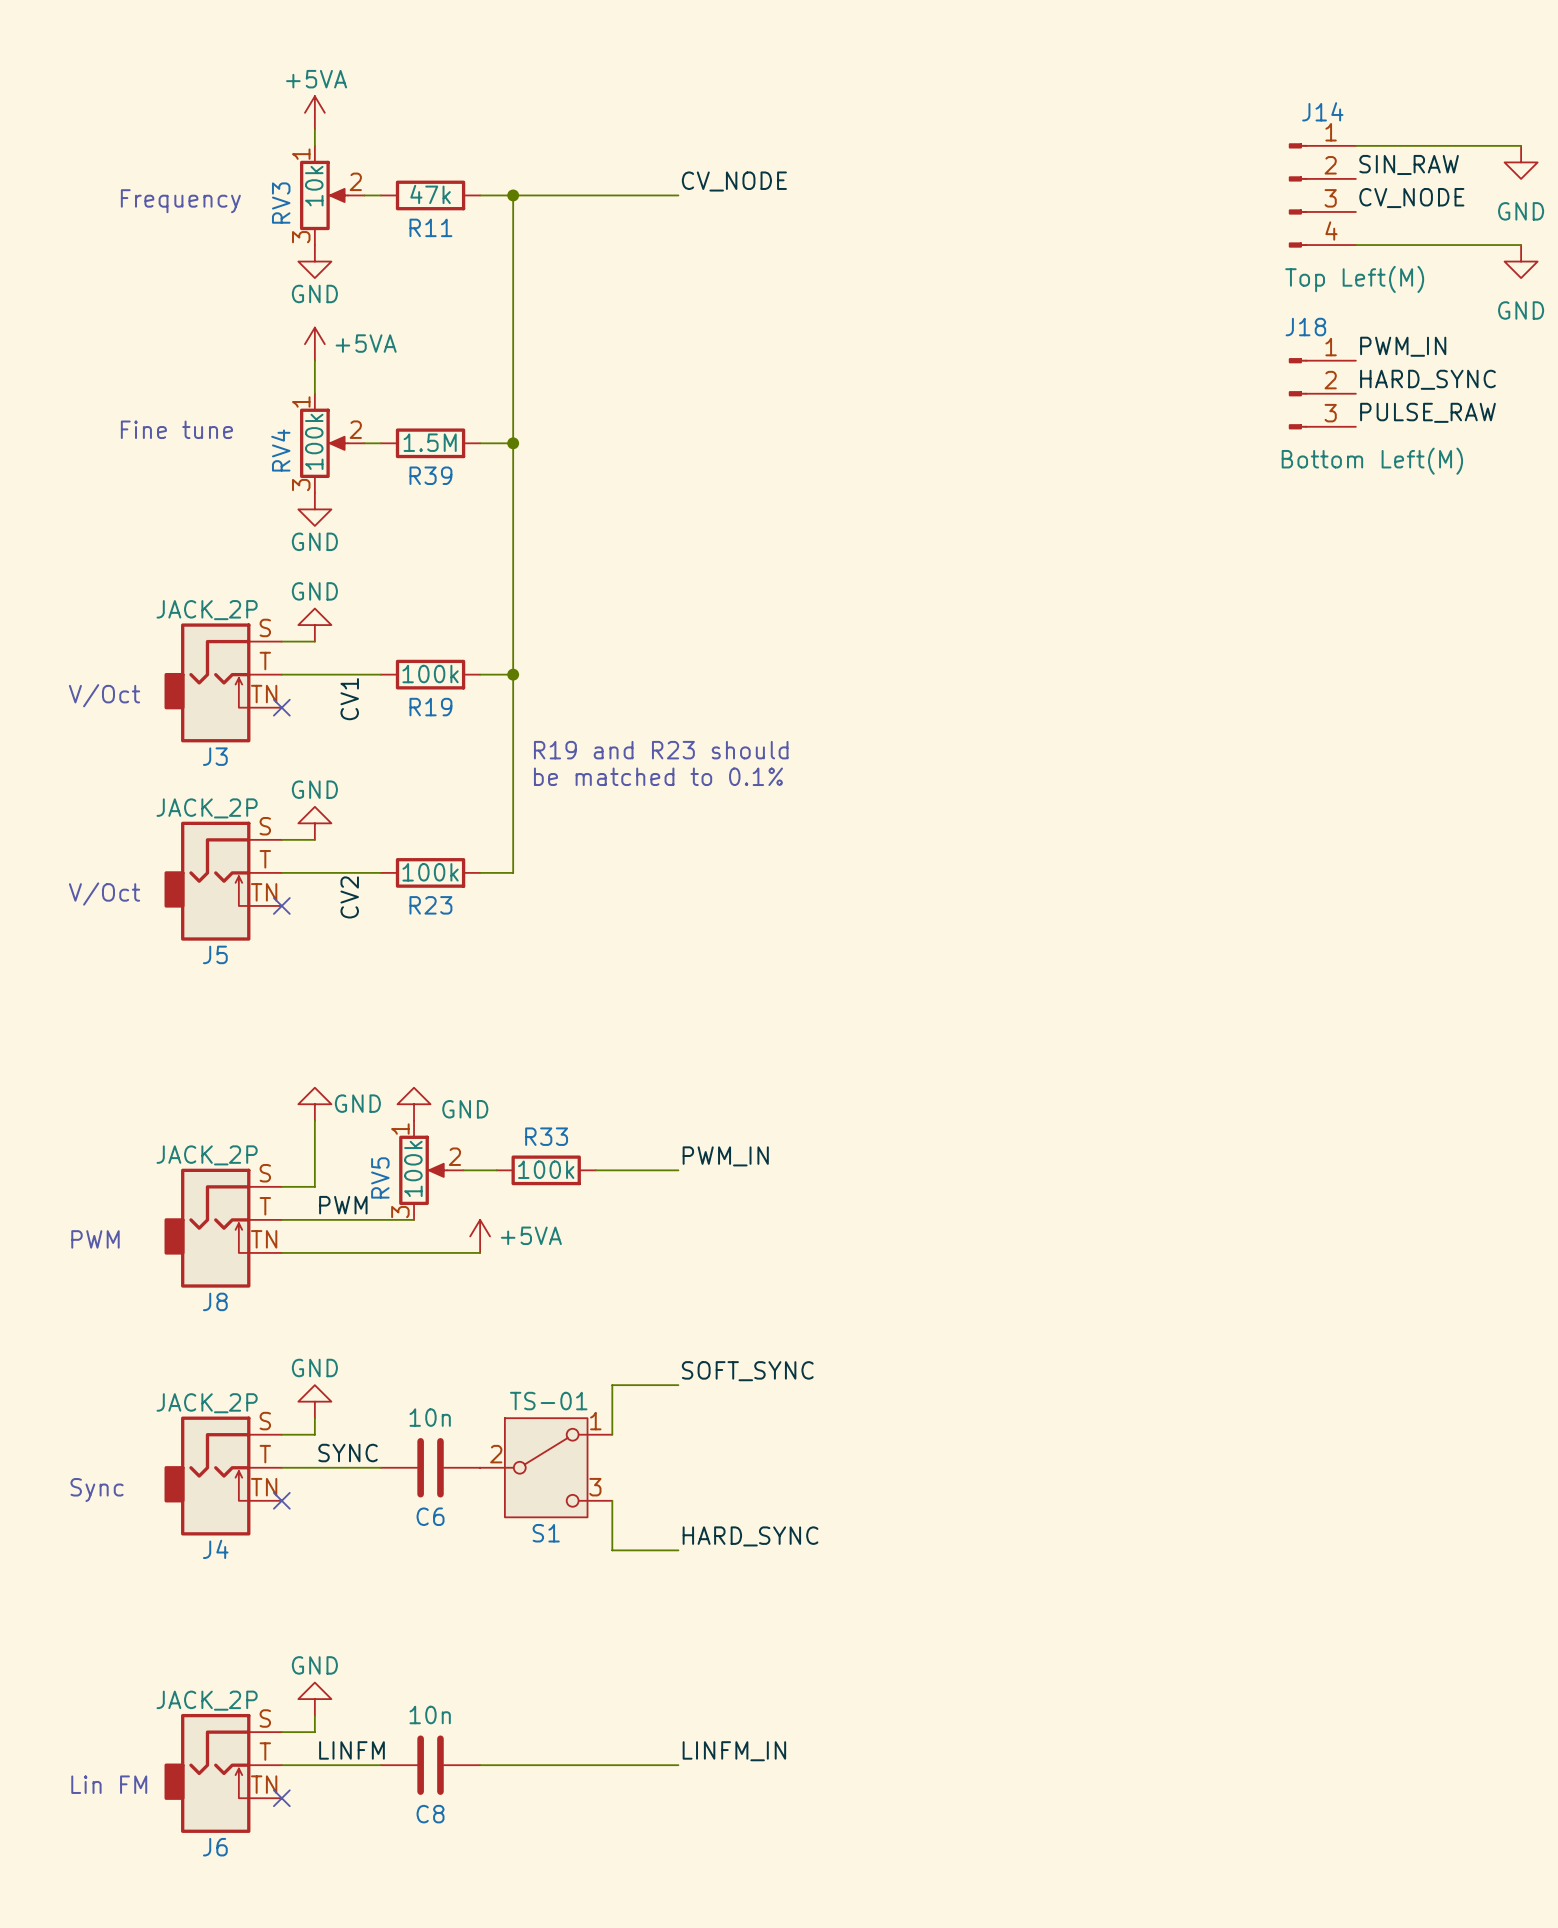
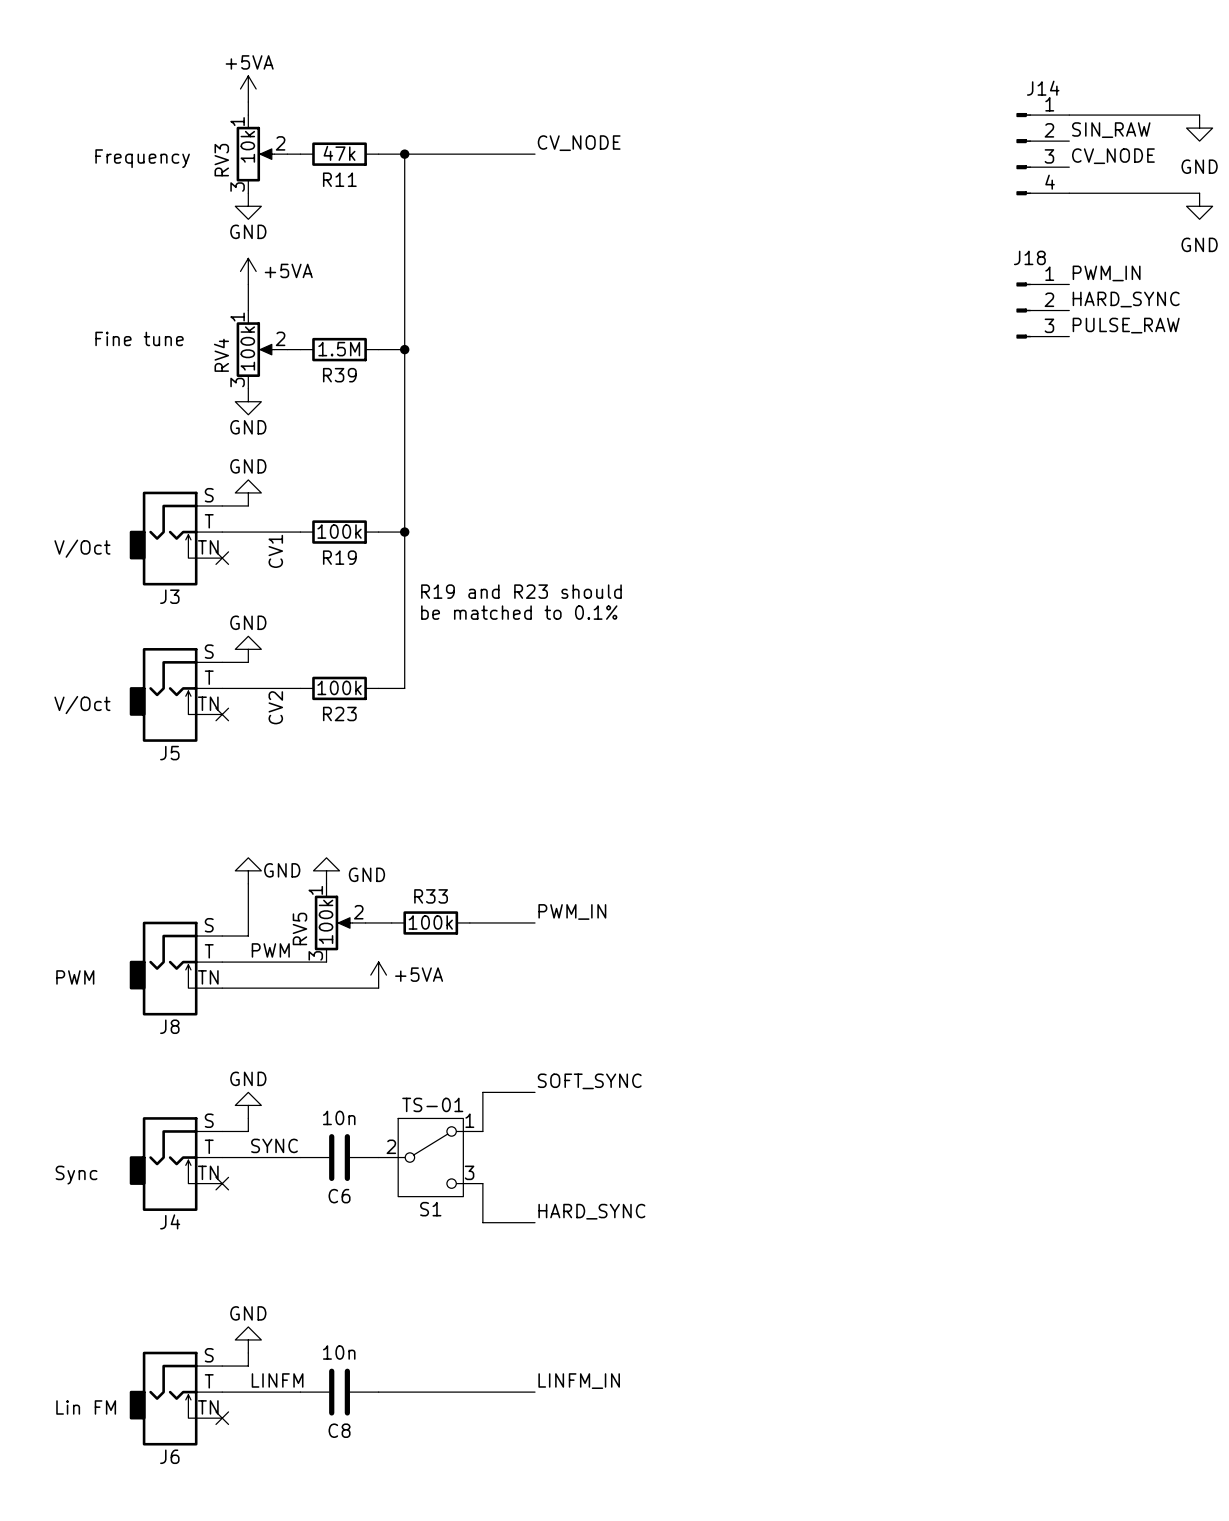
J14 value: Top Left(M) (1354, 279) -> none
J18 value: Bottom Left(M) (1372, 461) -> none
J3 value: JACK_2P (207, 610) -> none
J5 value: JACK_2P (207, 808) -> none
J8 value: JACK_2P (207, 1155) -> none
J4 value: JACK_2P (207, 1403) -> none
J6 value: JACK_2P (207, 1700) -> none

